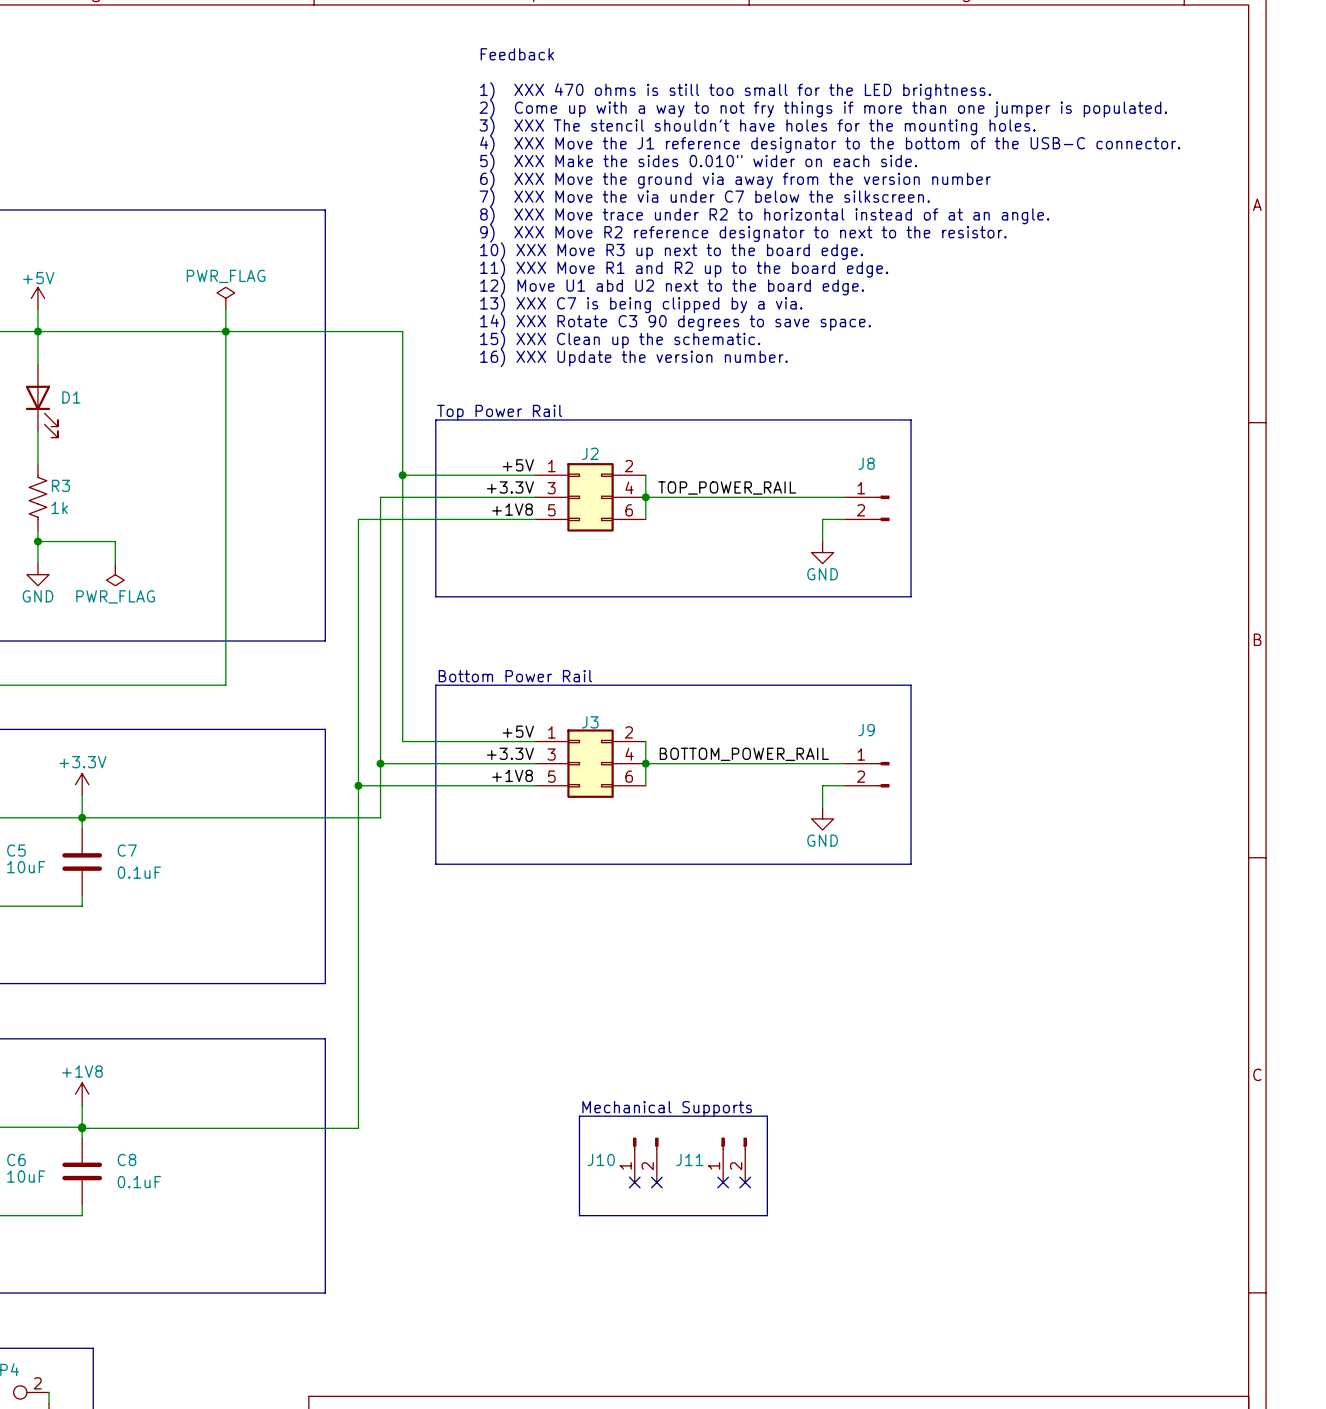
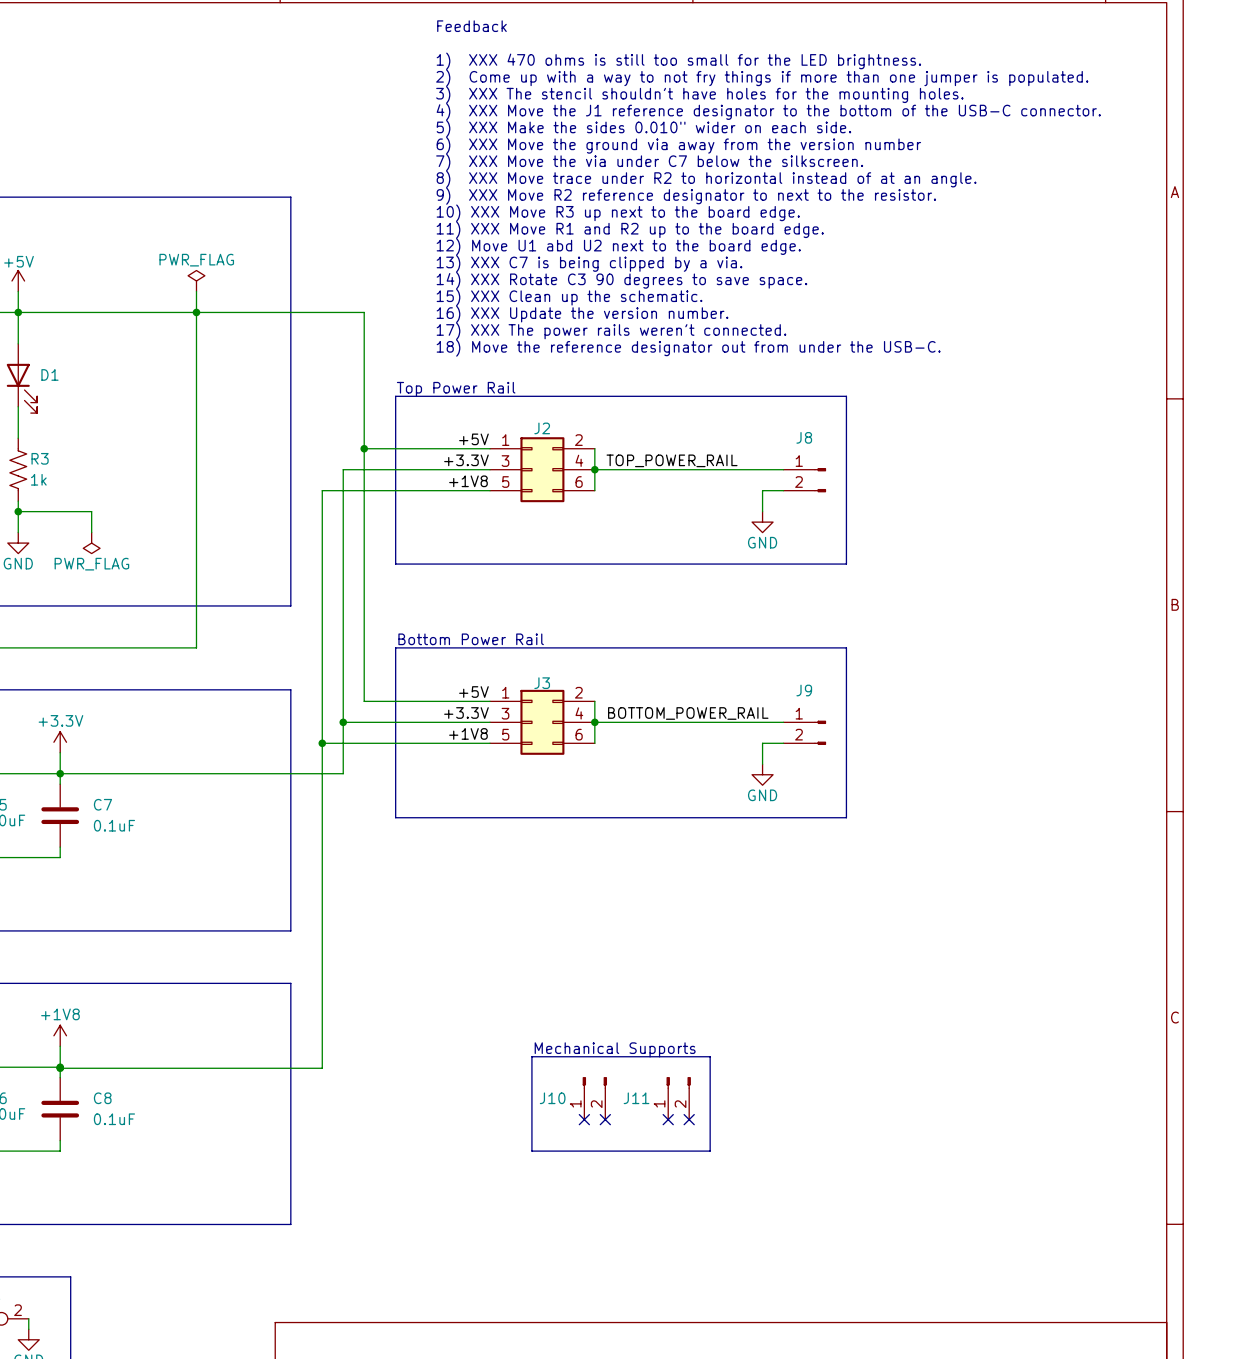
text position: Feedback (517, 54) -> Feedback (471, 26)
text position: 1) XXX 470 ohms is still too small for the LED brightness. (735, 91) -> 1) XXX 470 ohms is still too small for the LED brightness. (678, 61)
text position: 2) Come up with a way to not fry things if more than one jumper is populated. (823, 108) -> 2) Come up with a way to not fry things if more than one jumper is populated. (762, 78)
text position: 3) XXX The stencil shouldn't have holes for the mounting holes. (757, 126) -> 3) XXX The stencil shouldn't have holes for the mounting holes. (699, 94)
text position: 4) XXX Move the J1 reference designator to the bottom of the USB-C connector. (830, 144) -> 4) XXX Move the J1 reference designator to the bottom of the USB-C connector. (768, 111)
text position: 5) XXX Make the sides 0.010" wider on each side. (698, 162) -> 5) XXX Make the sides 0.010" wider on each side. (643, 128)
text position: 6) XXX Move the ground via away from the version number (735, 180) -> 6) XXX Move the ground via away from the version number (678, 145)
text position: 7) XXX Move the via under C7 below the silkscreen. (704, 197) -> 7) XXX Move the via under C7 below the silkscreen. (649, 162)
text position: 8) XXX Move trace under R2 to horizontal instead of at an angle. (764, 215) -> 8) XXX Move trace under R2 to horizontal instead of at an angle. (706, 179)
text position: 9) XXX Move R2 reference designator to next to the resistor. (743, 233) -> 9) XXX Move R2 reference designator to next to the resistor. (686, 196)
text position: 10) XXX Move R3 up next to the board edge. (671, 251) -> 10) XXX Move R3 up next to the board edge. (618, 213)
text position: 11) XXX Move R1 and R2 up to the board edge. (684, 269) -> 11) XXX Move R1 and R2 up to the board edge. (630, 229)
text position: 12) Move U1 abd U2 next to the board edge. (672, 286) -> 12) Move U1 abd U2 next to the board edge. (618, 246)
text position: 13) XXX C7 is being clipped by a via. (641, 304) -> 13) XXX C7 is being clipped by a via. (589, 263)
text position: 14) XXX Rotate C3 90 degrees to save space. (675, 322) -> 14) XXX Rotate C3 90 degrees to save space. (621, 280)
text position: 15) XXX Clean up the schematic. (620, 340) -> 15) XXX Clean up the schematic. (569, 297)
text: none -> 17) XXX The power rails weren't connected. (611, 331)
text position: 16) XXX Update the version number. (633, 358) -> 16) XXX Update the version number. (582, 314)
text: none -> 18) Move the reference designator out from under the USB-C. (688, 348)

